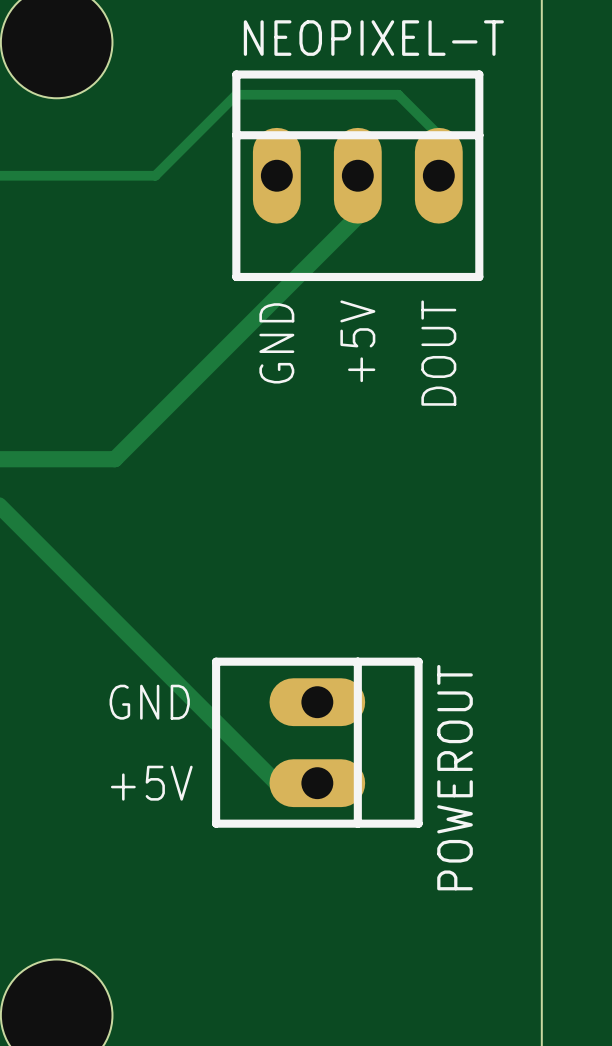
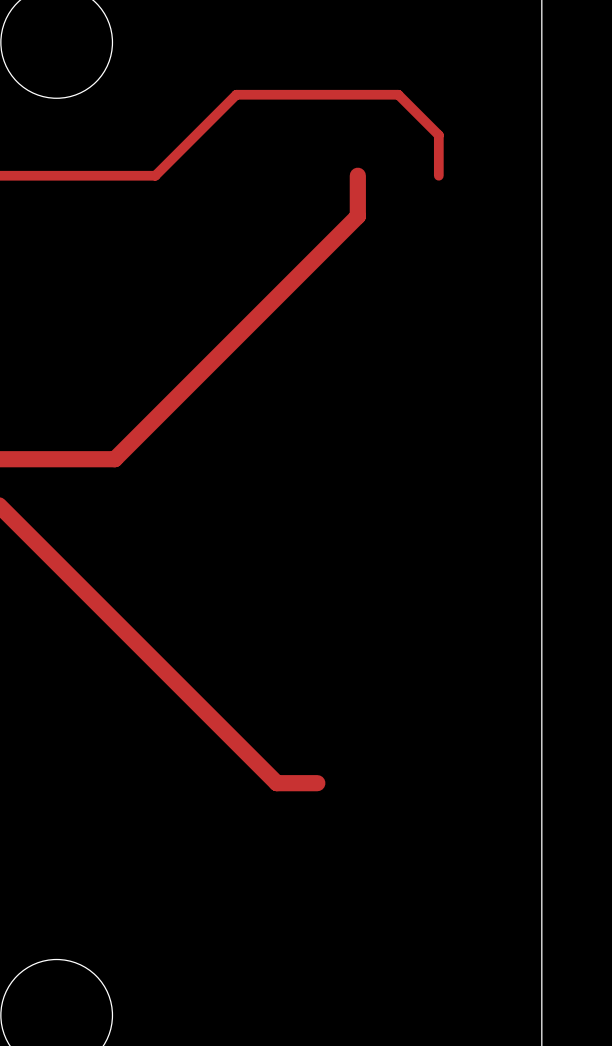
NEOPIXEL-T: (357, 175) -> none
text: +5V (357, 341) -> none
text: GND (276, 343) -> none
text: DOUT (438, 353) -> none
text: GND (149, 702) -> none
POWEROUT: (317, 742) -> none
text: +5V (151, 783) -> none

